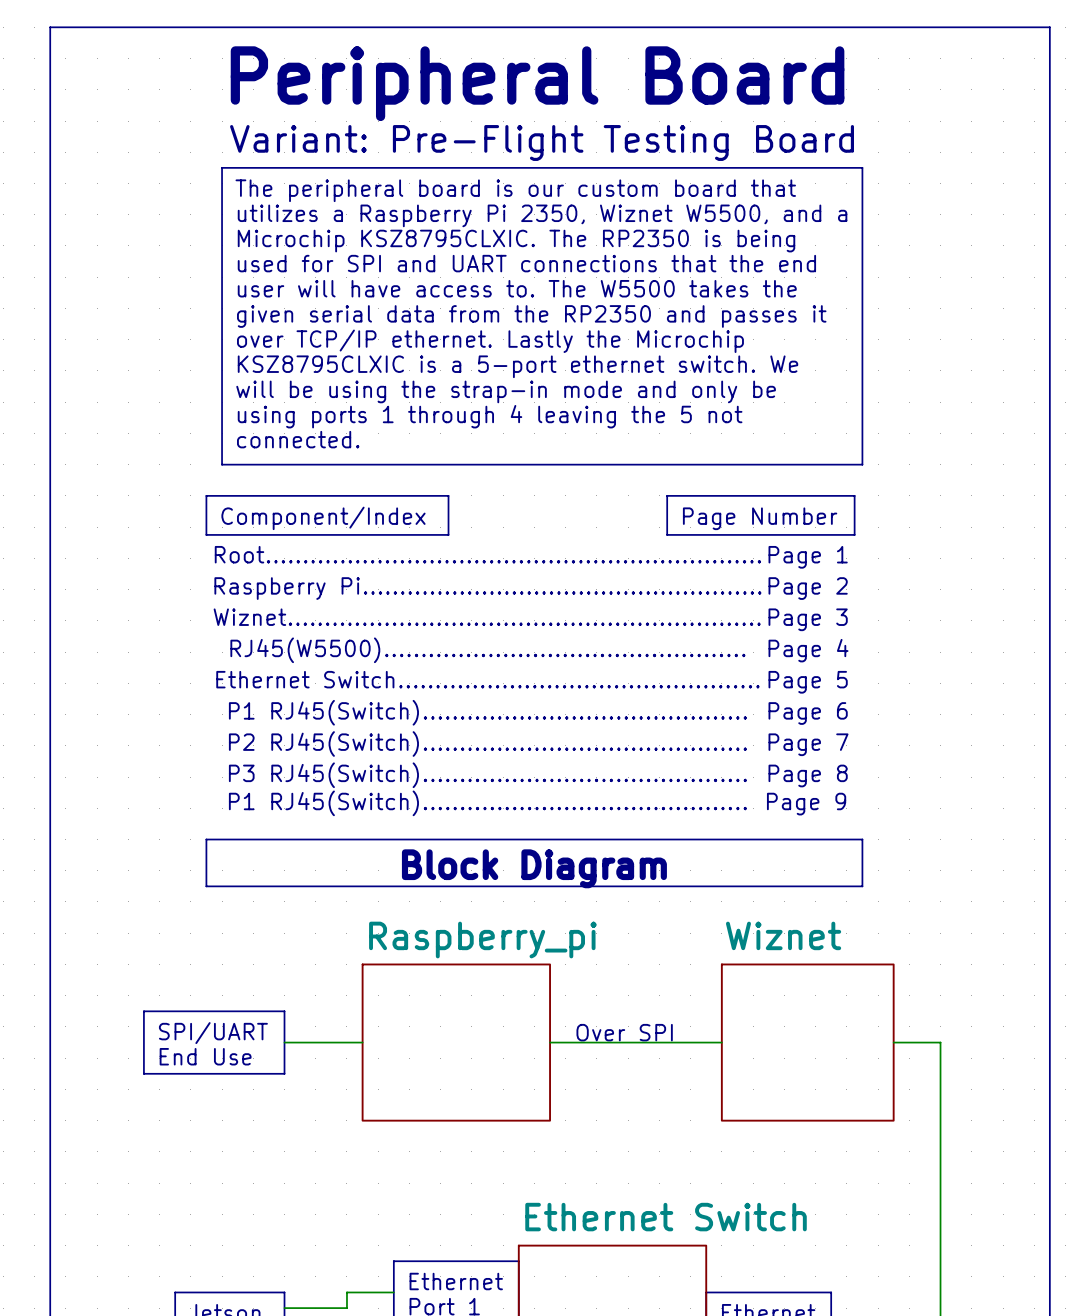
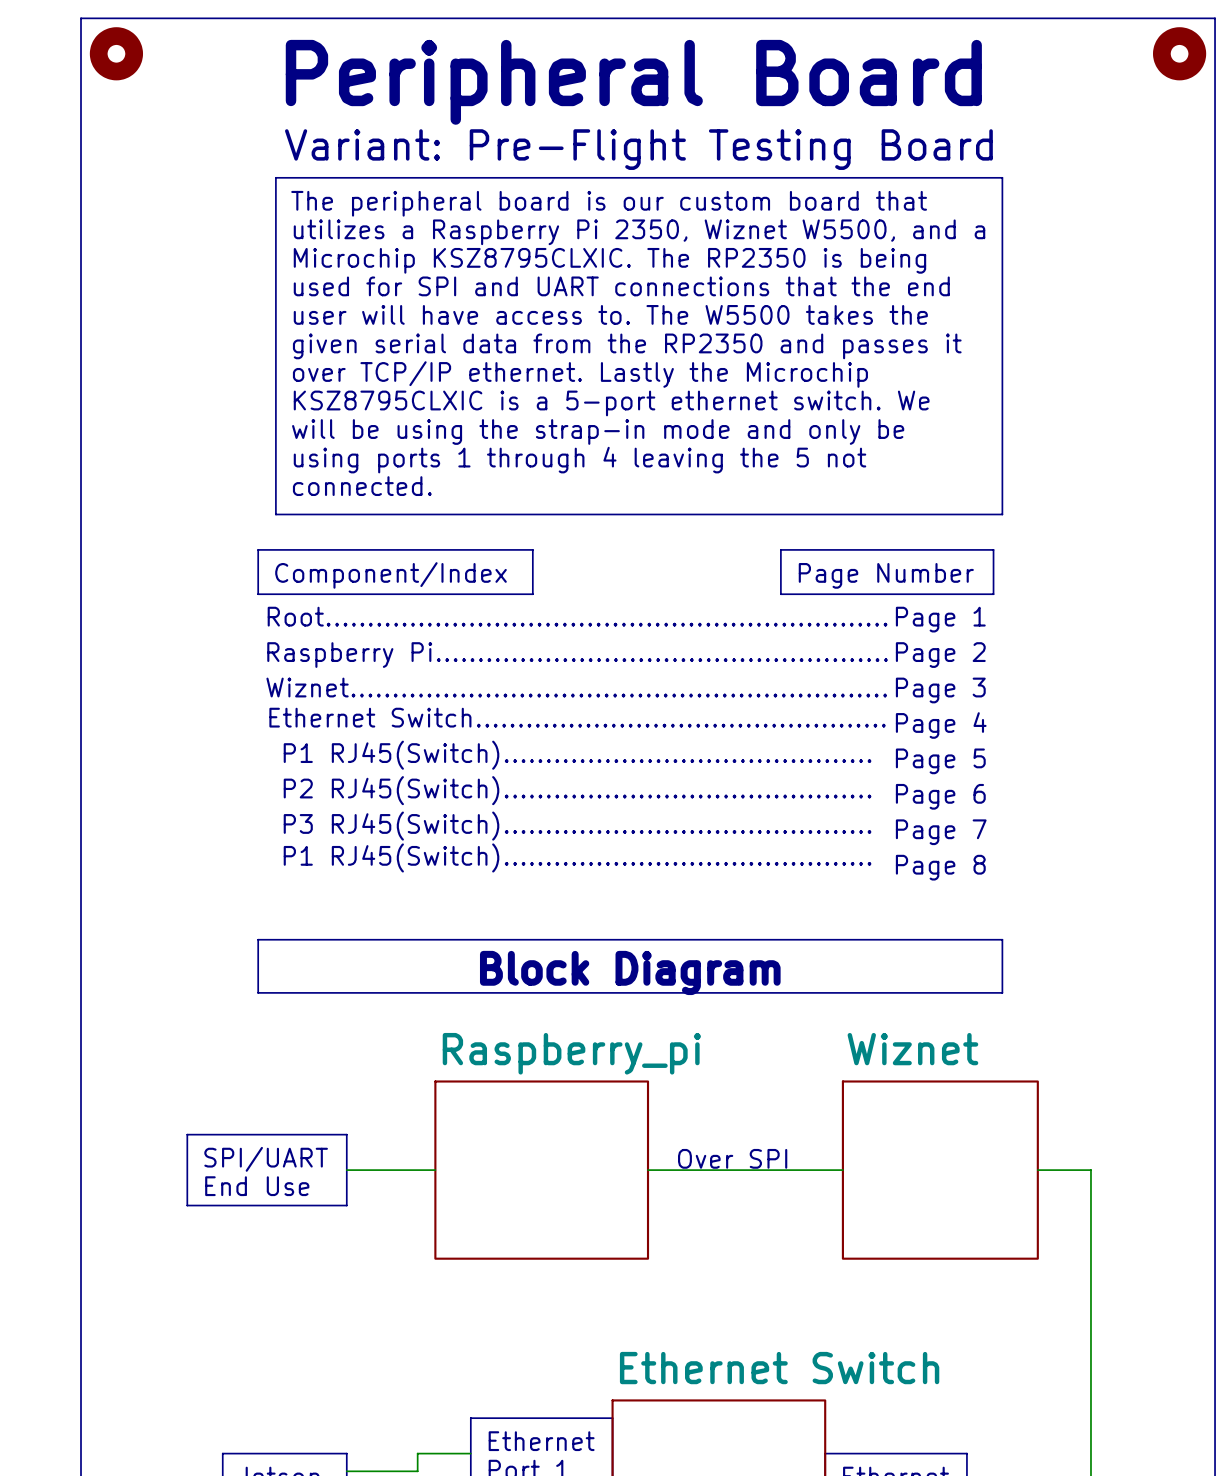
part: none -> (116, 53)
part: none -> (1179, 53)
text: RJ45(W5500)................................................. (487, 650) -> P1 RJ45(Switch)............................................ (577, 755)
text position: Ethernet Switch................................................. (487, 679) -> Ethernet Switch................................................. (577, 717)
text: P1 RJ45(Switch)............................................ (487, 712) -> none
text position: P2 RJ45(Switch)............................................ (487, 743) -> P2 RJ45(Switch)............................................ (577, 790)
text: none -> P1 RJ45(Switch)............................................ (577, 857)
text position: P3 RJ45(Switch)............................................ (487, 775) -> P3 RJ45(Switch)............................................ (577, 826)
text: P1 RJ45(Switch)............................................ (487, 803) -> none
text: Page 9 (806, 804) -> none

